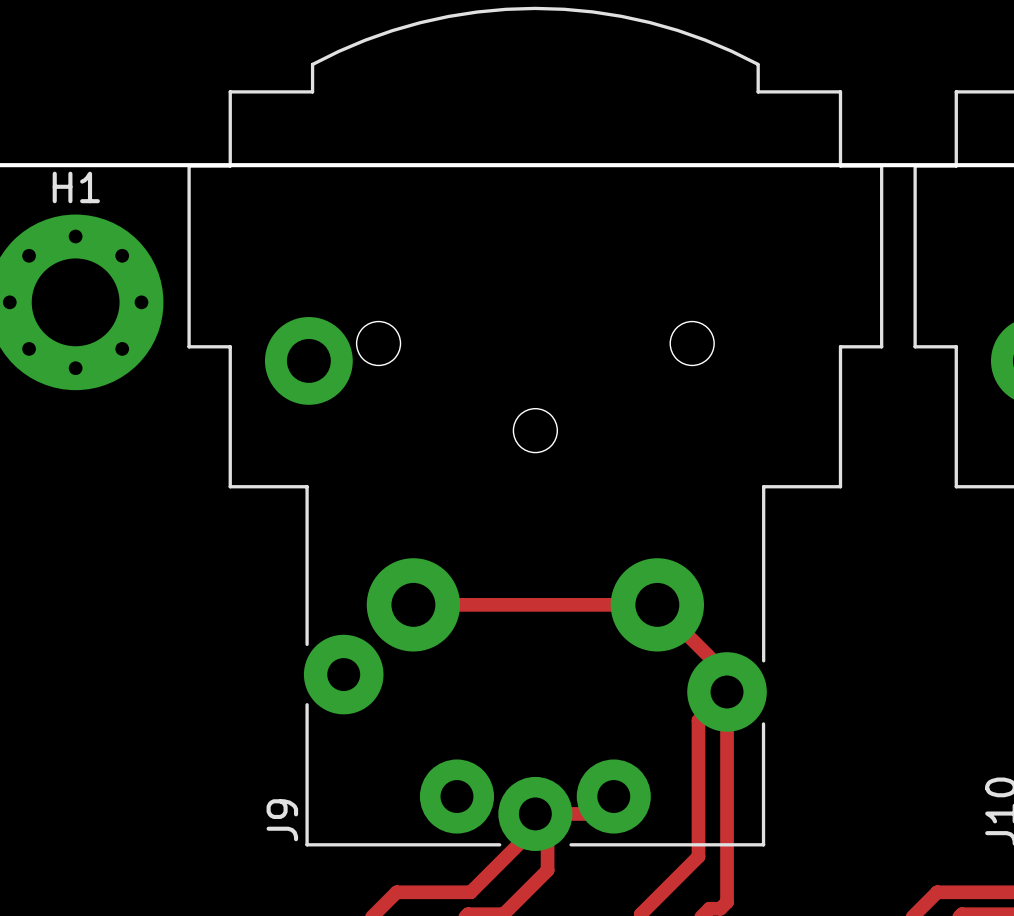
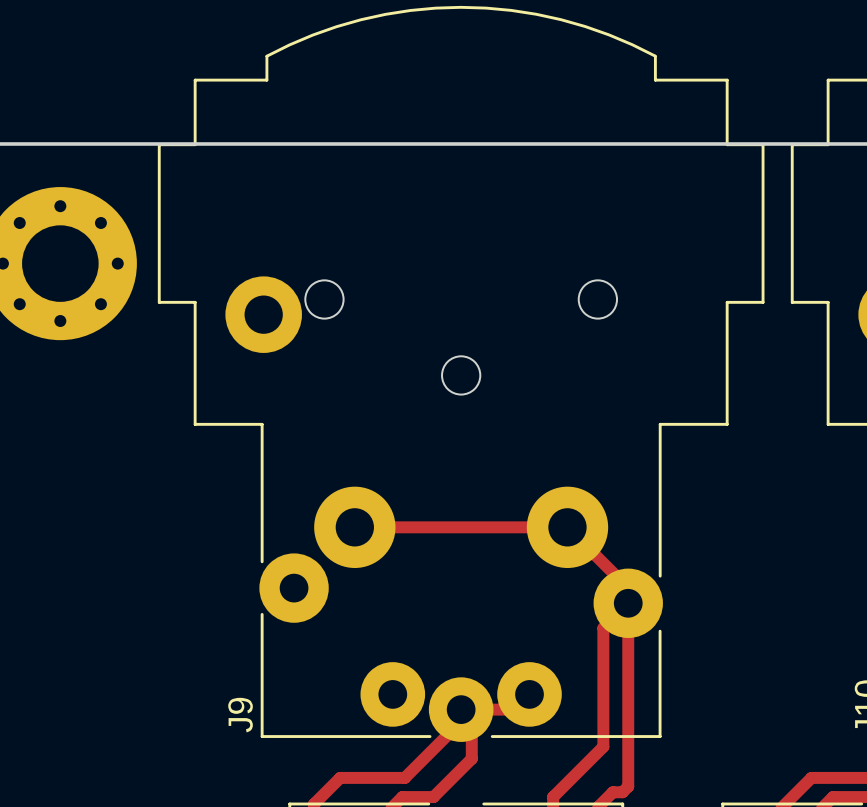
H1 name: H1 (76, 187) -> none

